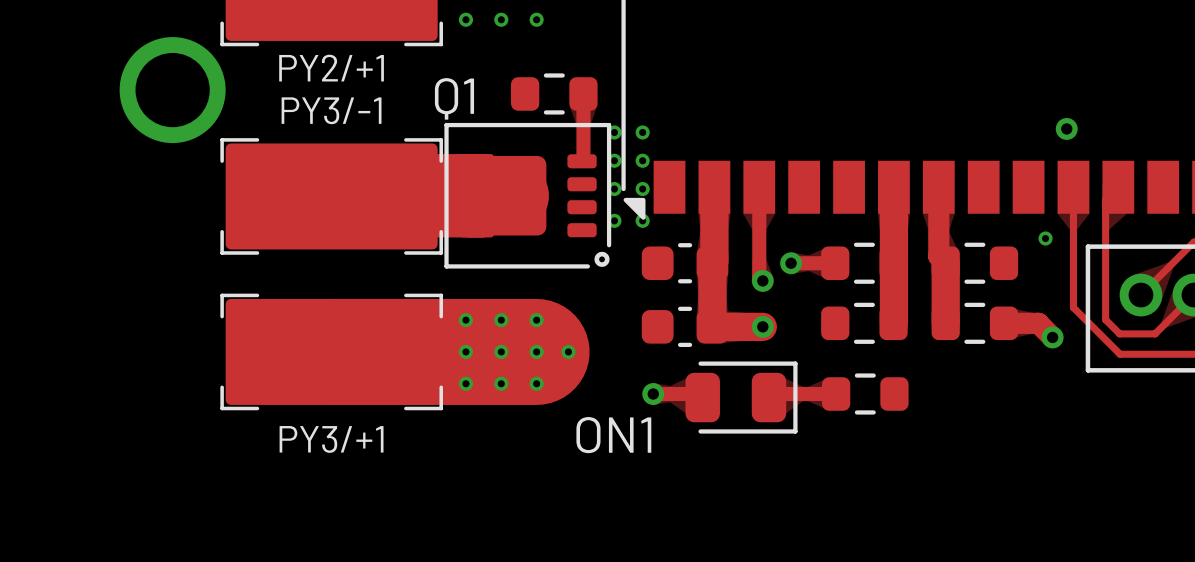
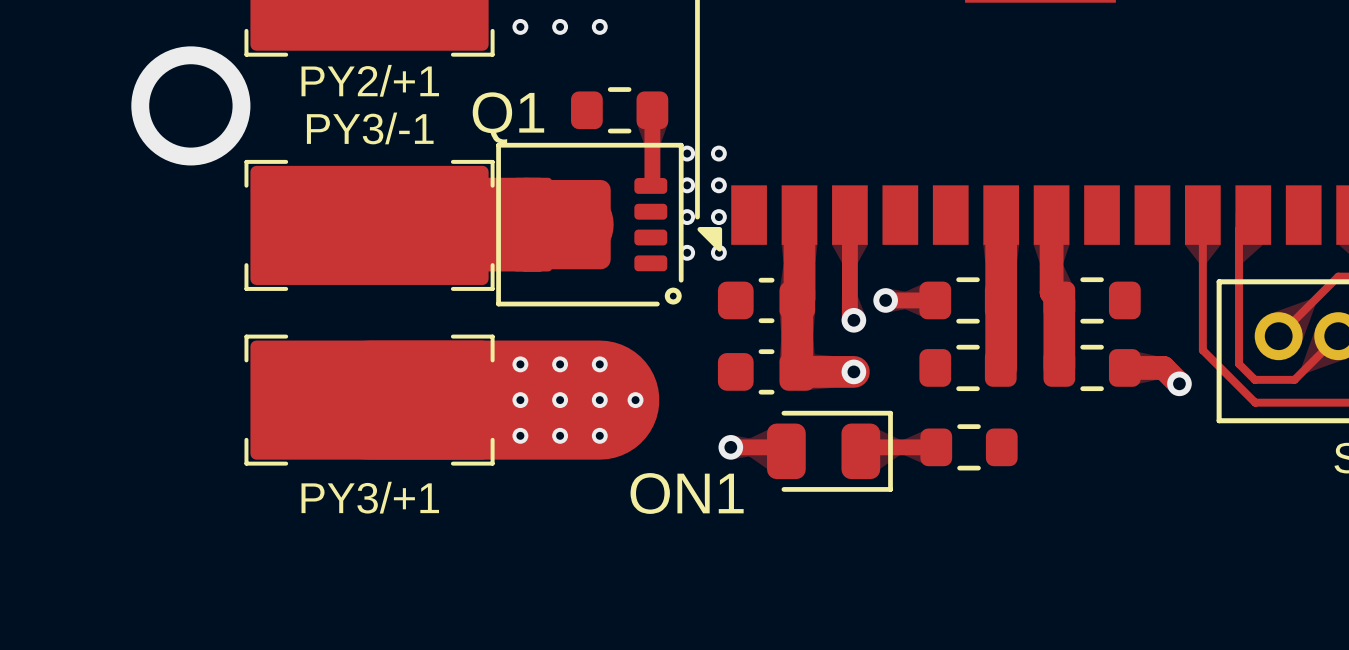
via: (1066, 128) -> none
via: (1045, 238) -> none

